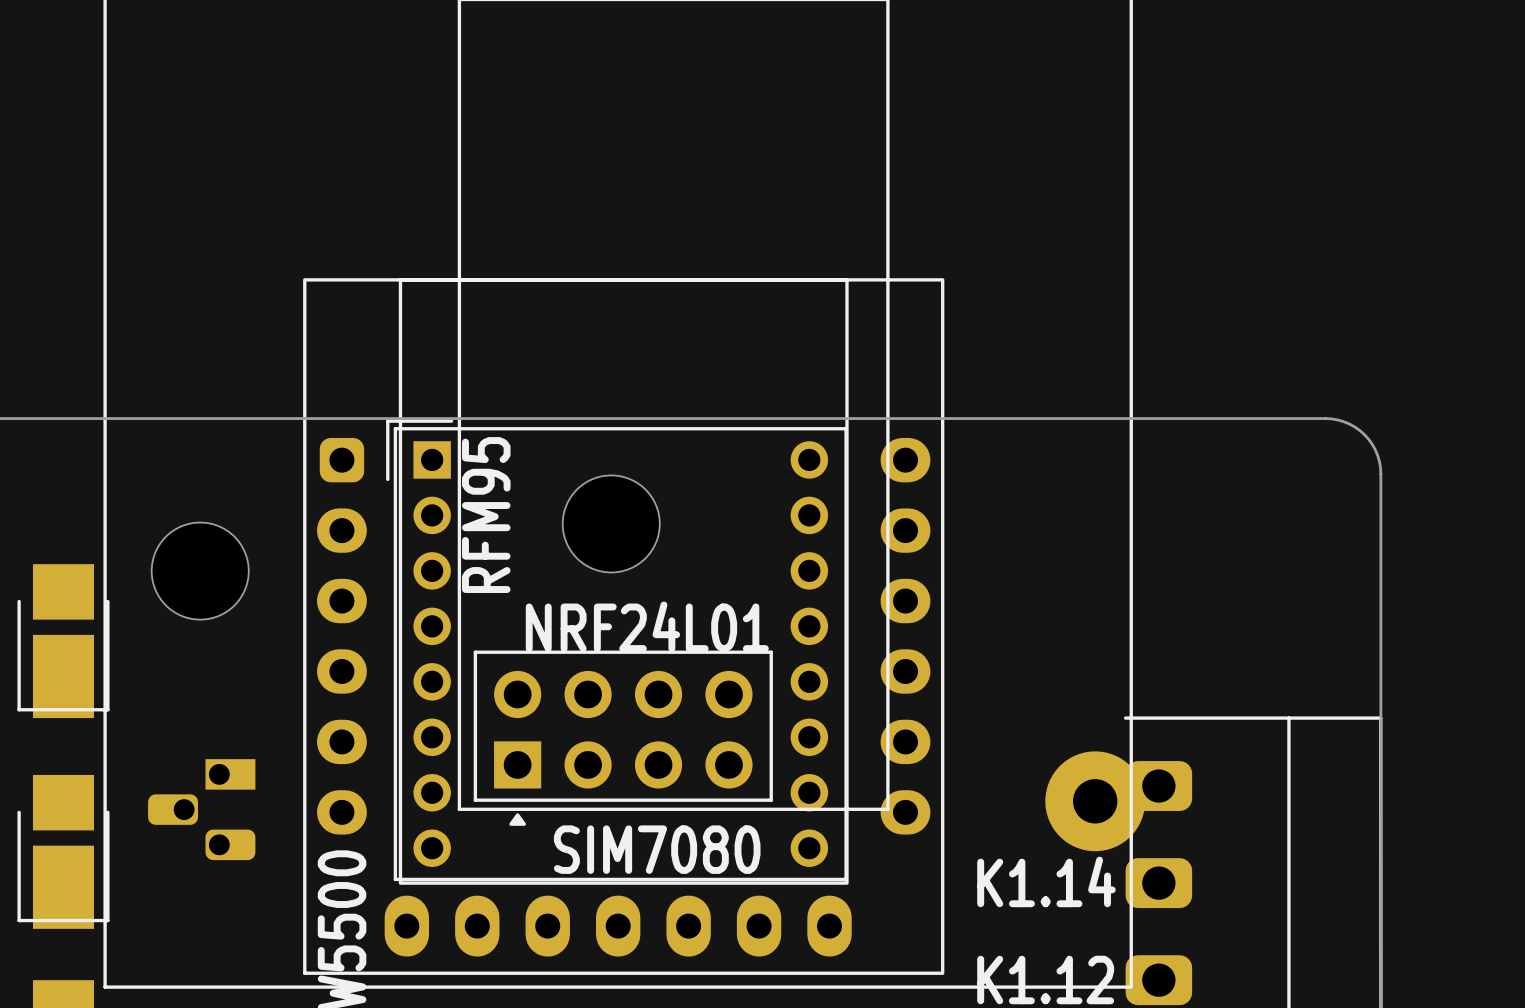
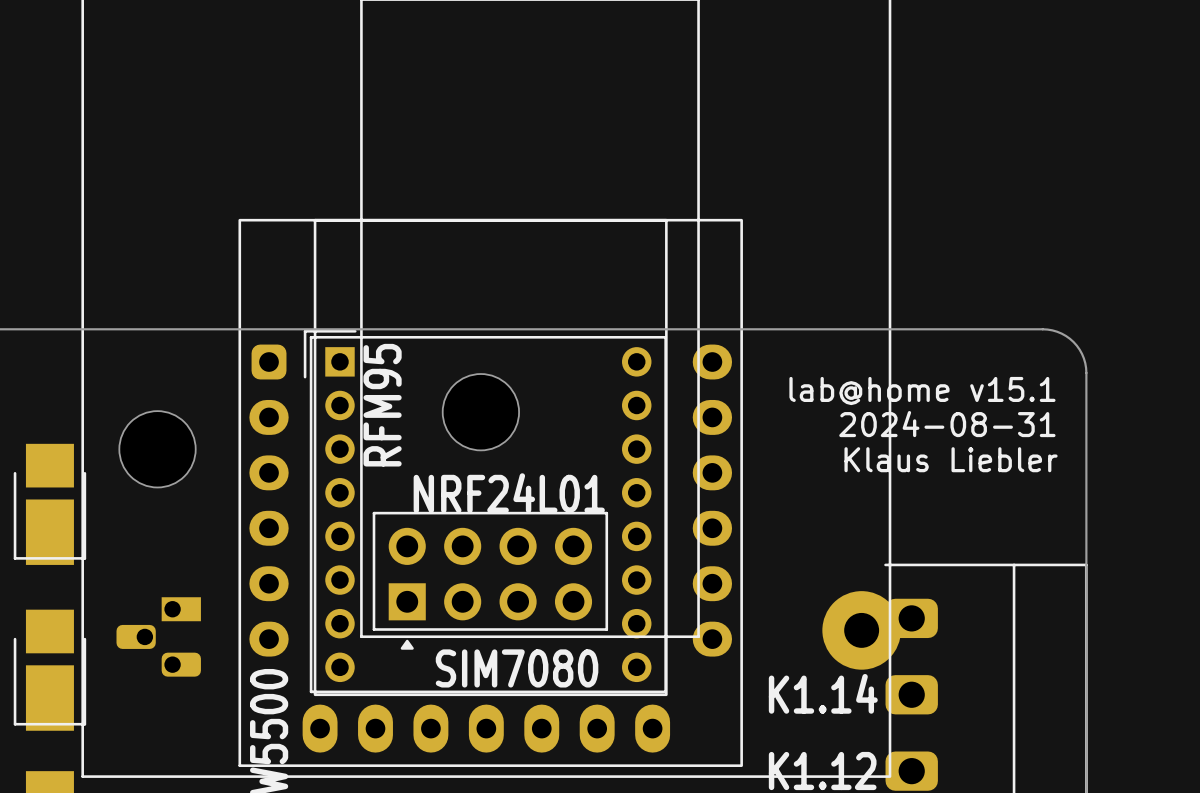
text: none -> lab@home v15.1 (922, 391)
text: none -> 2024-08-31 (947, 424)
text: none -> Klaus Liebler (951, 459)

